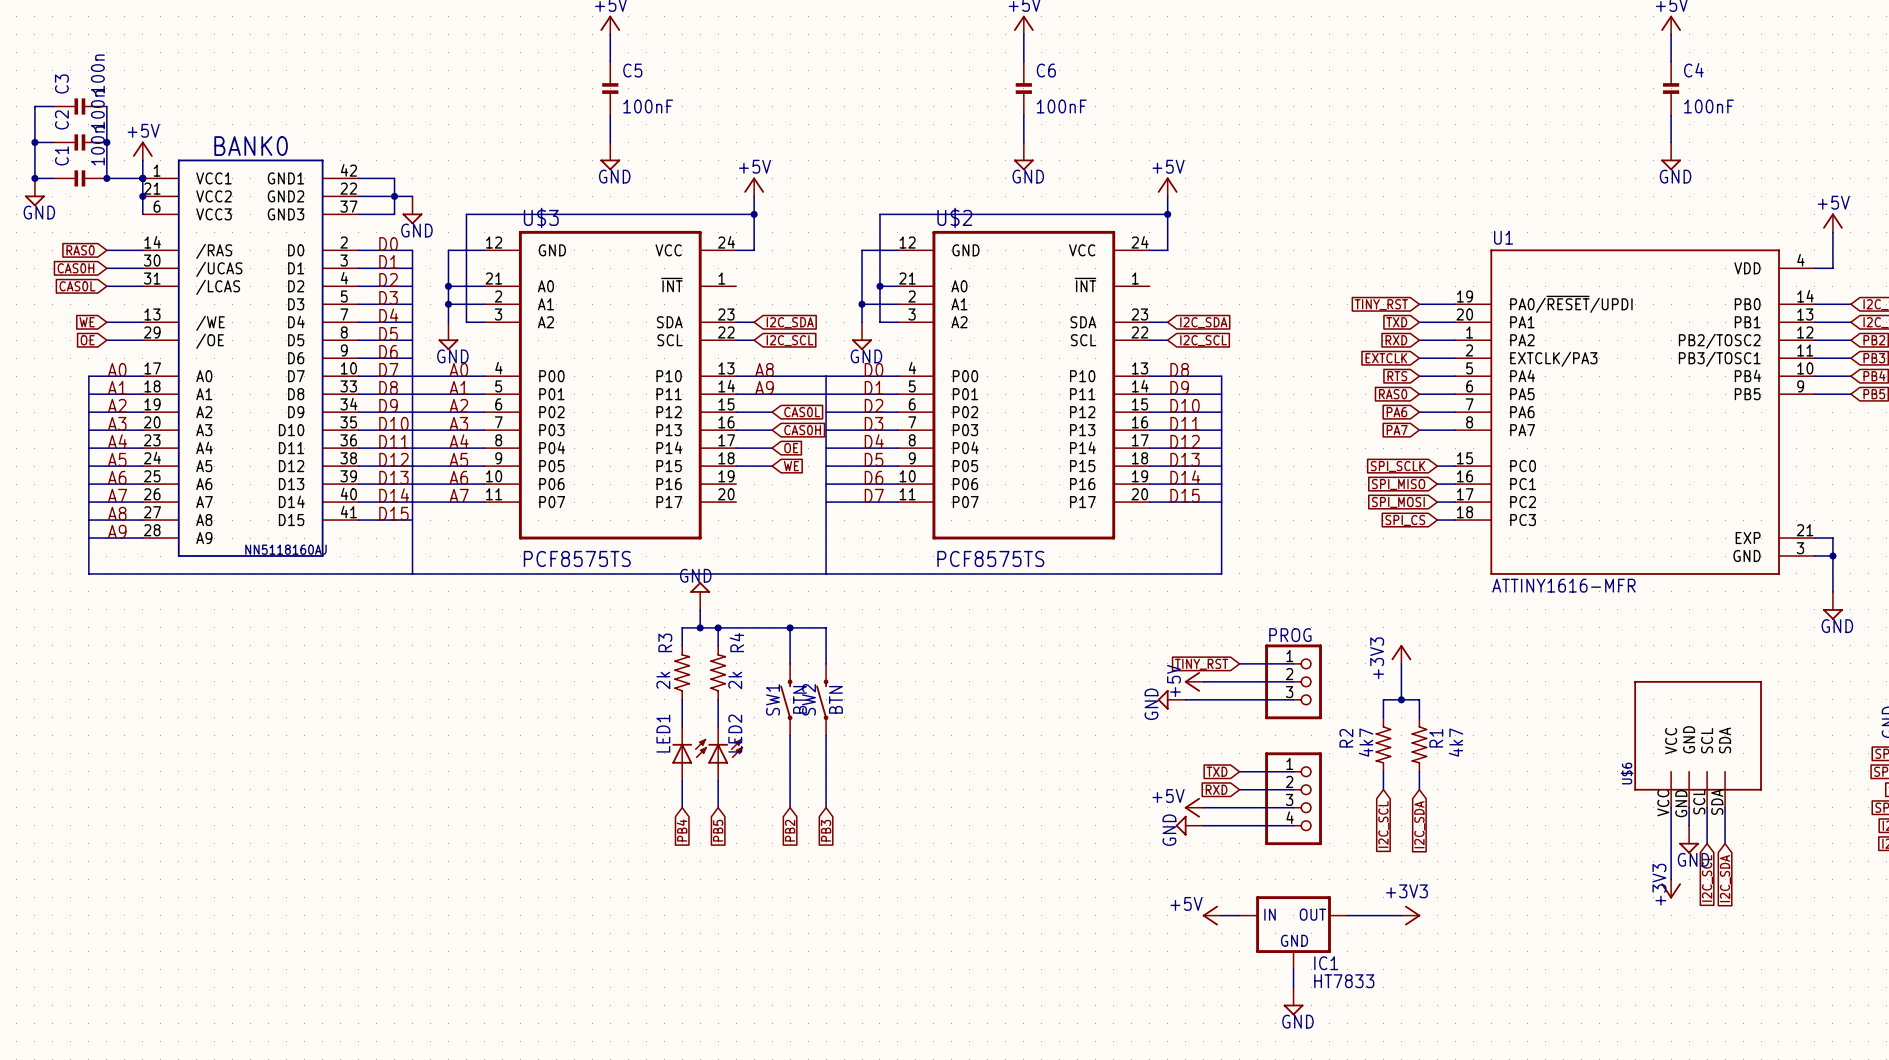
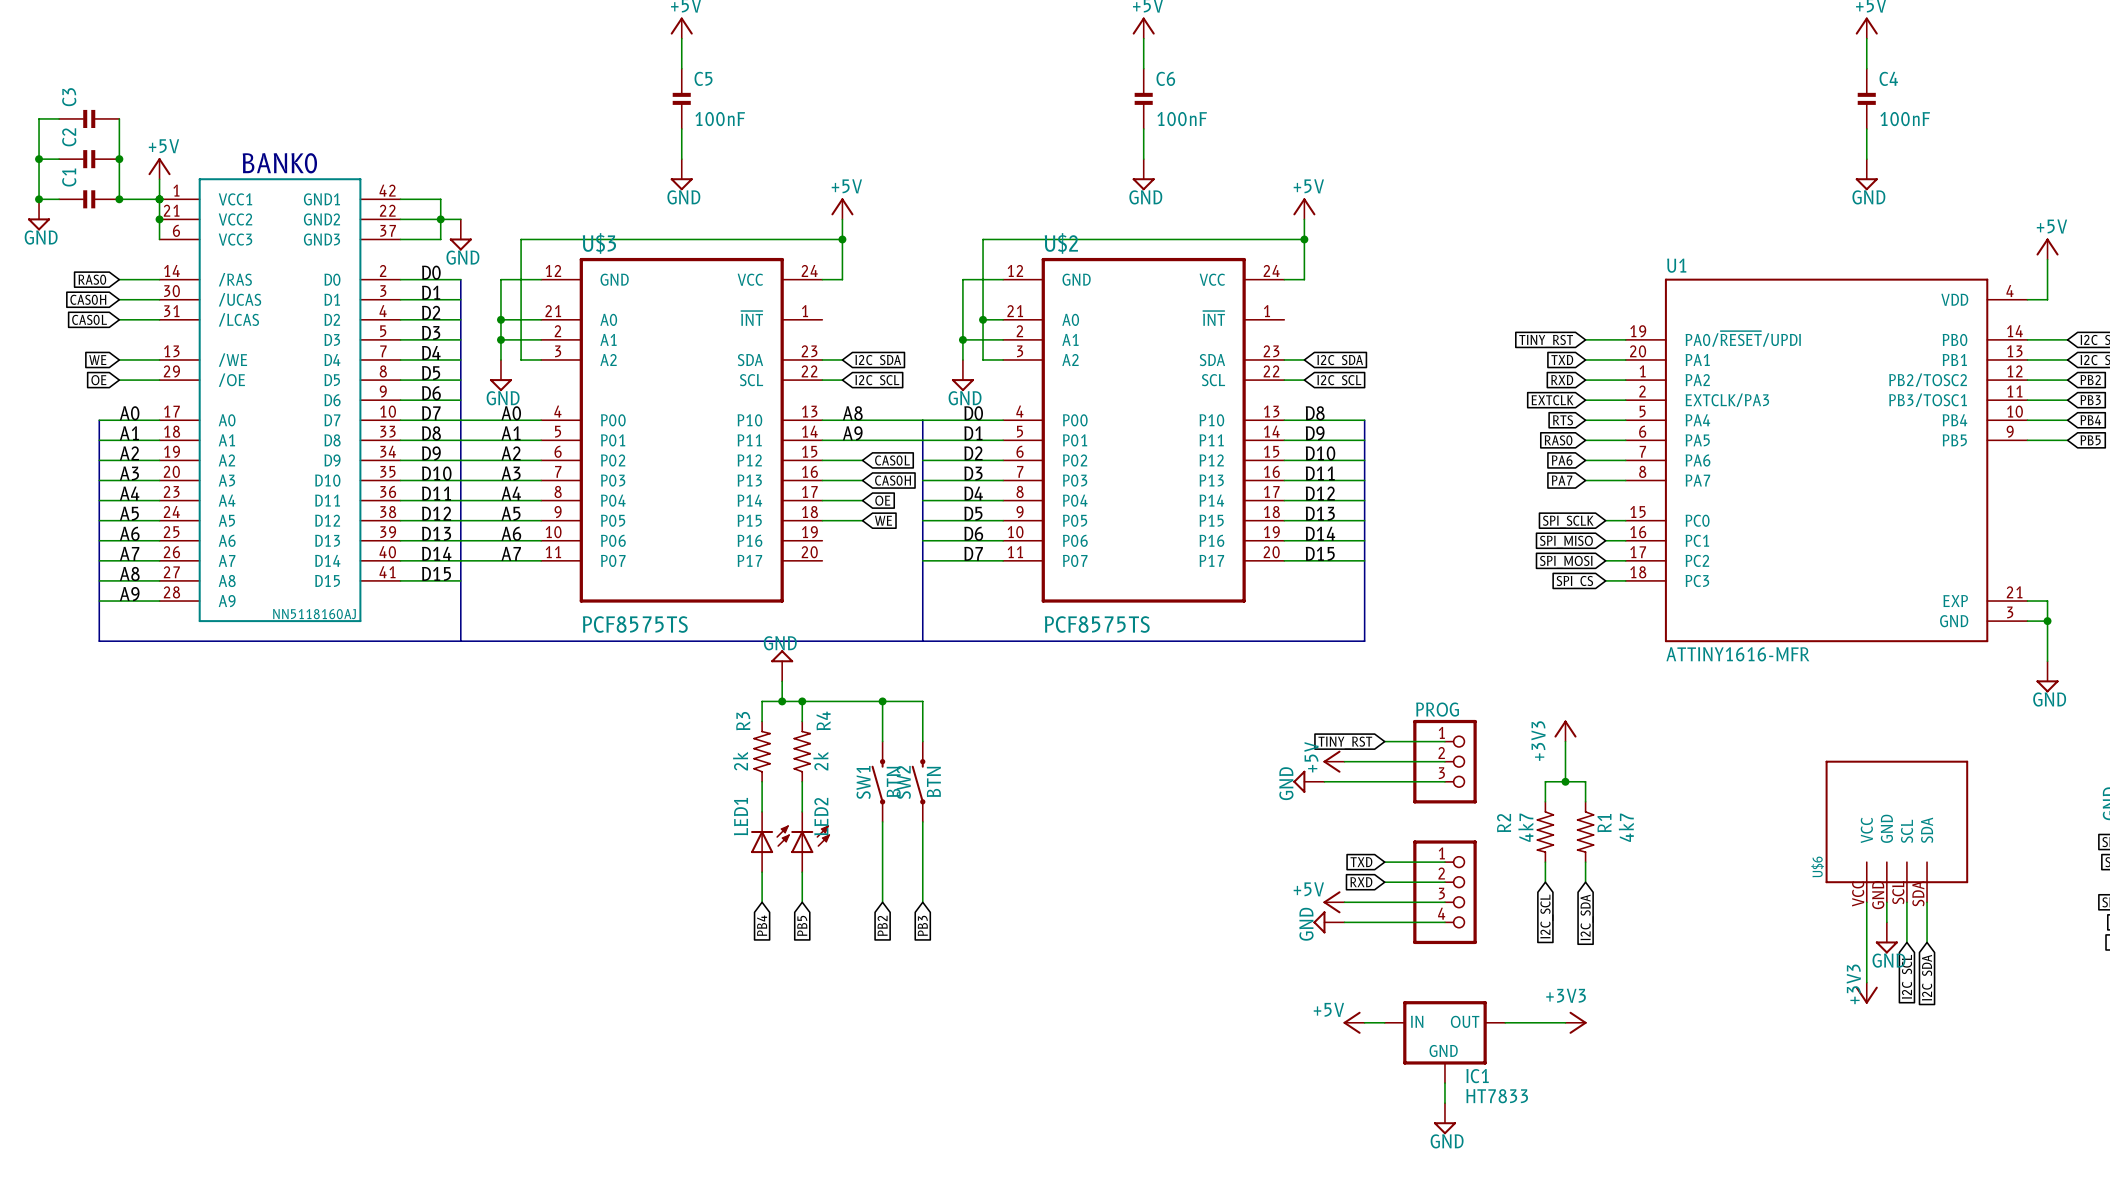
C3 value: 100n (97, 74) -> none
C2 value: 100n (97, 109) -> none
C1 value: 100n (97, 145) -> none

